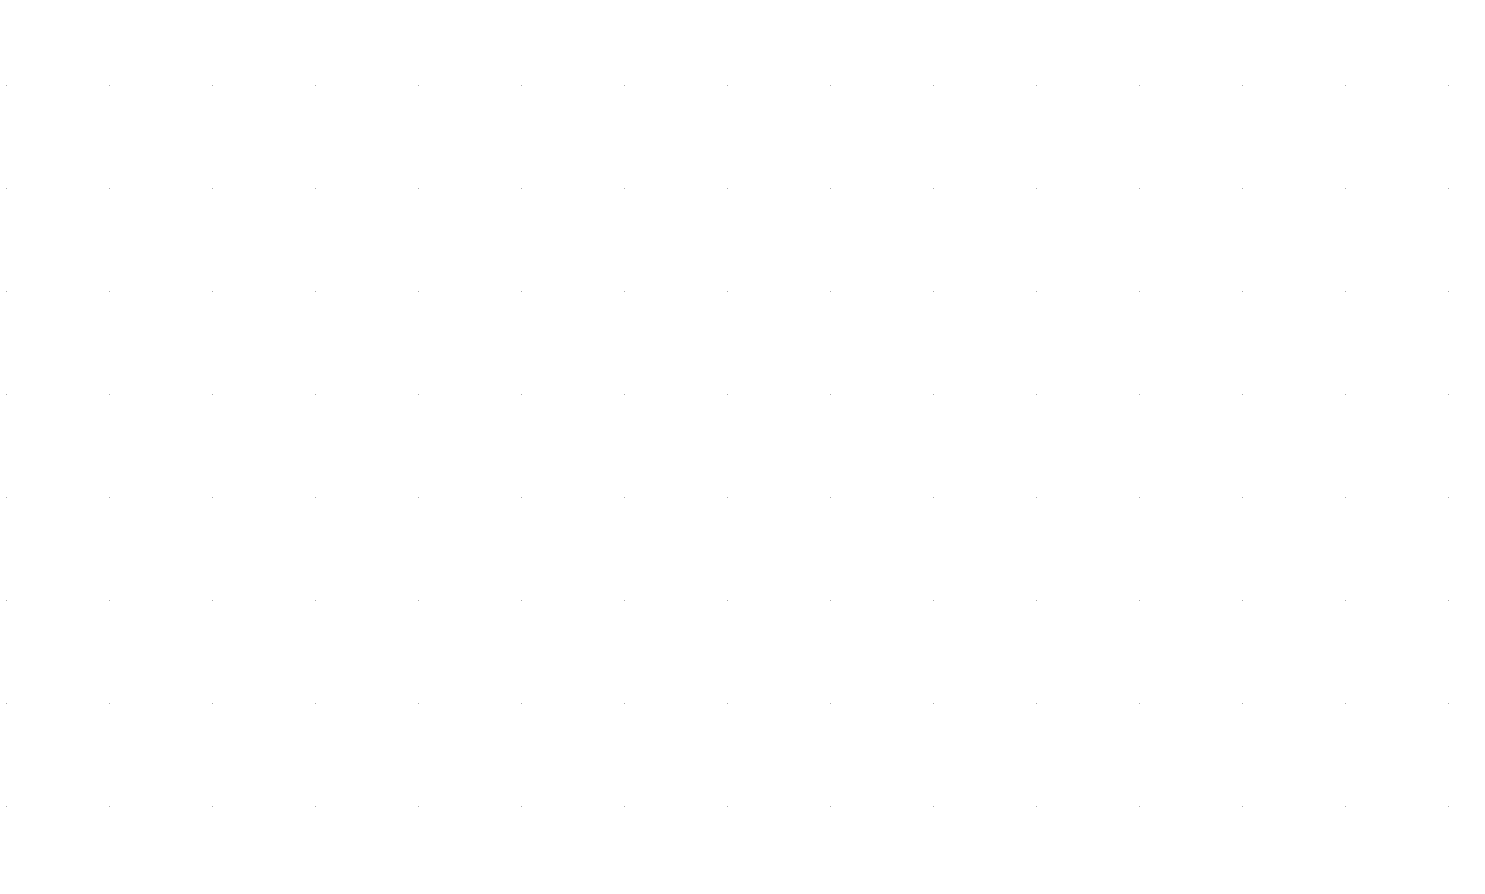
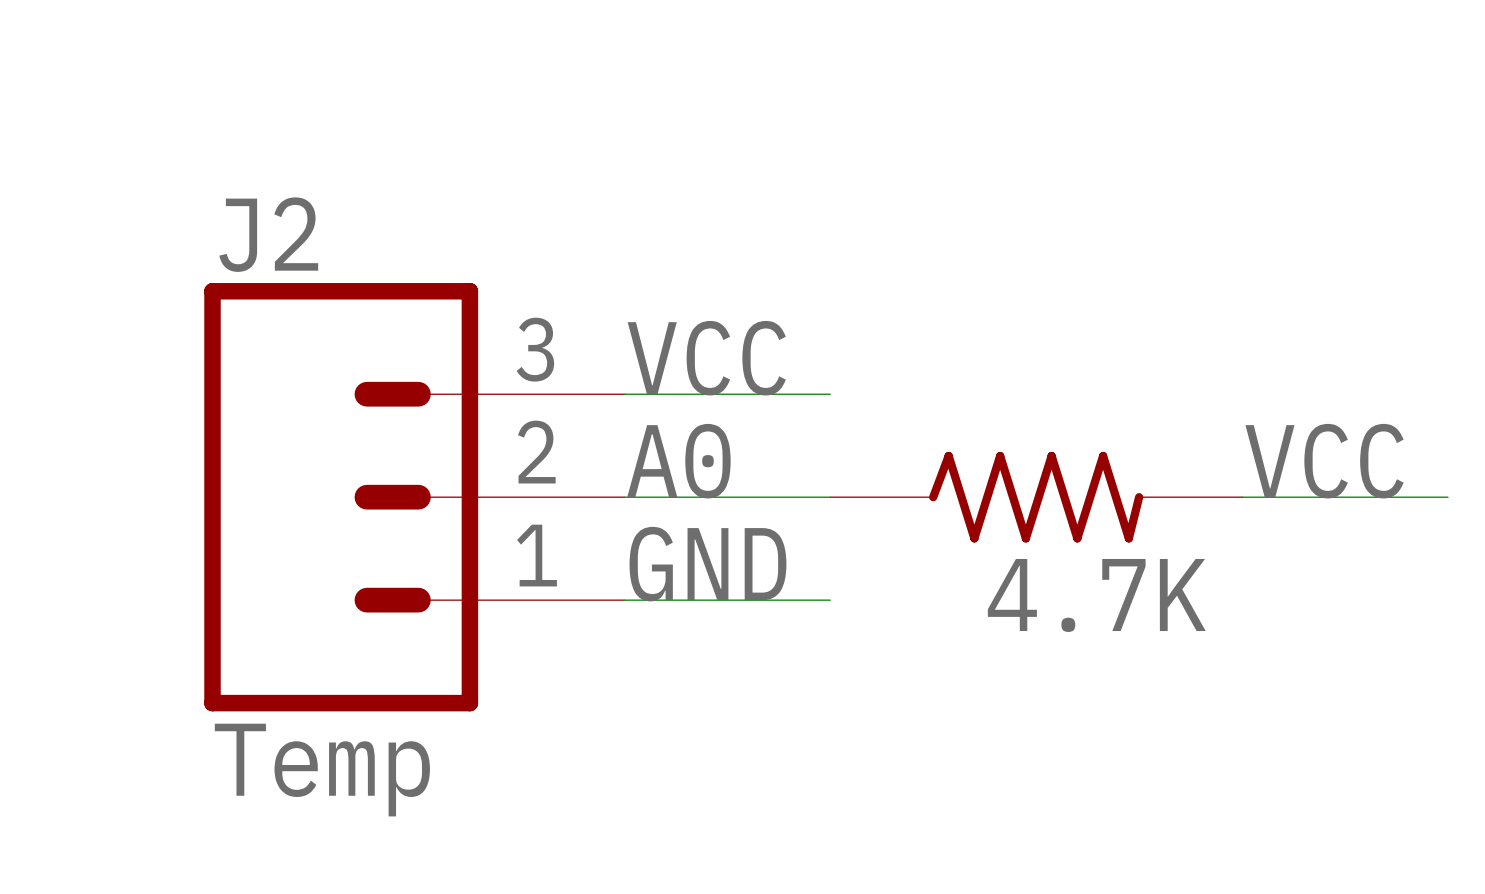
label: none -> VCC (706, 358)
wire: none -> (624, 394) (830, 394)
label: none -> A0 (678, 461)
label: none -> VCC (1324, 461)
J2: none -> Temp (414, 497)
wire: none -> (624, 497) (830, 497)
part: none -> 4.7K (1036, 497)
wire: none -> (1242, 497) (1448, 497)
label: none -> GND (707, 564)
wire: none -> (624, 600) (830, 600)

